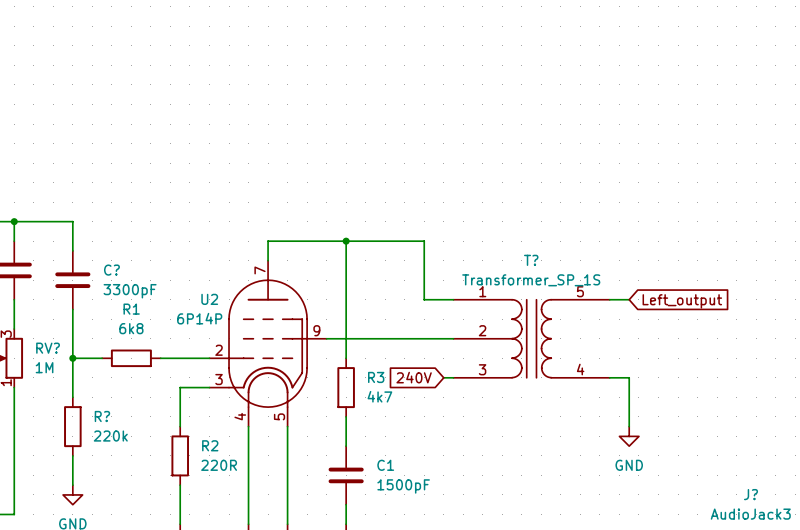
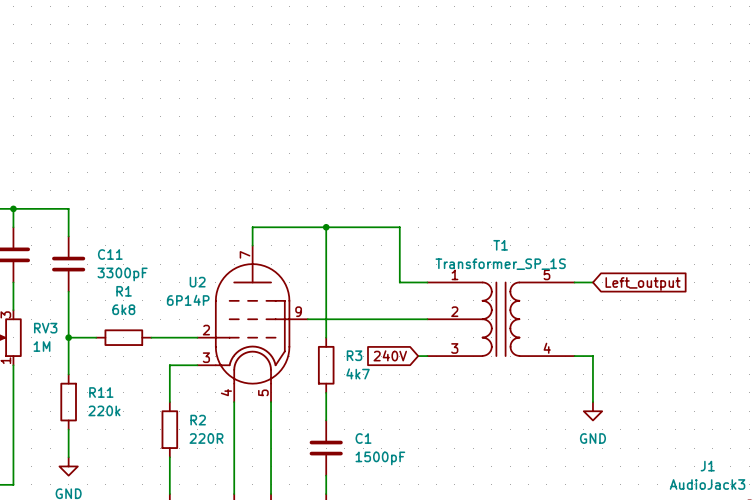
T? name: T? (531, 260) -> T1 (500, 245)
C? name: C? (111, 270) -> C11 (110, 254)
RV? name: RV? (48, 348) -> RV3 (45, 328)
R? name: R? (102, 416) -> R11 (101, 392)
J? name: J? (750, 494) -> J1 (707, 466)

